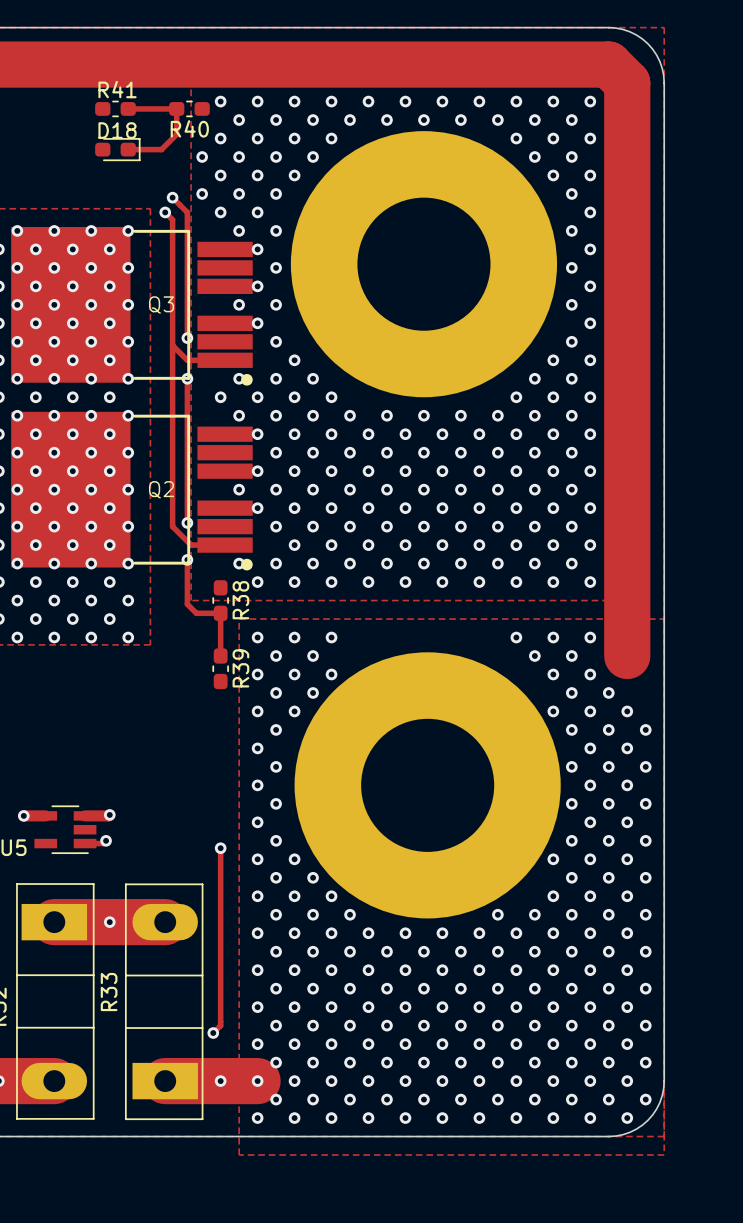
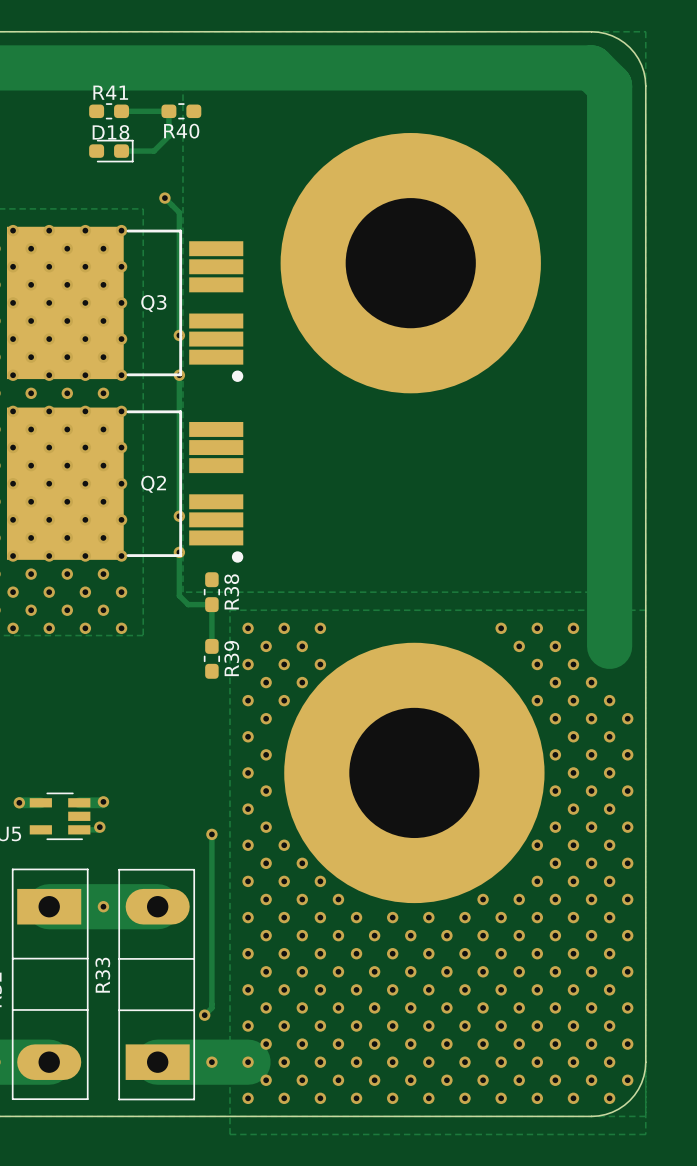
via: (220, 101) -> none
via: (257, 101) -> none
via: (294, 101) -> none
via: (331, 101) -> none
via: (368, 101) -> none
via: (405, 101) -> none
via: (442, 101) -> none
via: (479, 101) -> none
via: (516, 101) -> none
via: (553, 101) -> none
via: (590, 101) -> none
via: (239, 120) -> none
via: (276, 120) -> none
via: (313, 120) -> none
via: (350, 120) -> none
via: (386, 120) -> none
via: (423, 120) -> none
via: (460, 120) -> none
via: (497, 120) -> none
via: (534, 120) -> none
via: (571, 120) -> none
via: (220, 138) -> none
via: (257, 138) -> none
via: (294, 138) -> none
via: (331, 138) -> none
via: (516, 138) -> none
via: (553, 138) -> none
via: (590, 138) -> none
via: (202, 156) -> none
via: (239, 156) -> none
via: (276, 156) -> none
via: (313, 156) -> none
via: (534, 156) -> none
via: (571, 156) -> none
via: (220, 175) -> none
via: (257, 175) -> none
via: (294, 175) -> none
via: (553, 175) -> none
via: (590, 175) -> none
via: (202, 193) -> none
via: (239, 193) -> none
via: (276, 193) -> none
via: (571, 193) -> none
track: (165, 212) (172, 219) (172, 526) (191, 545) (225, 545) -> none
via: (165, 212) -> none
via: (220, 212) -> none
via: (257, 212) -> none
via: (590, 212) -> none
via: (239, 230) -> none
via: (276, 230) -> none
via: (571, 230) -> none
via: (257, 249) -> none
via: (590, 249) -> none
via: (276, 267) -> none
via: (571, 267) -> none
via: (257, 286) -> none
via: (590, 286) -> none
via: (239, 304) -> none
via: (276, 304) -> none
via: (571, 304) -> none
via: (257, 323) -> none
via: (590, 323) -> none
via: (276, 341) -> none
via: (571, 341) -> none
track: (172, 345) (187, 360) (225, 360) -> none
via: (294, 360) -> none
via: (553, 360) -> none
via: (590, 360) -> none
via: (239, 378) -> none
via: (276, 378) -> none
via: (313, 378) -> none
via: (534, 378) -> none
via: (571, 378) -> none
via: (220, 397) -> none
via: (257, 397) -> none
via: (294, 397) -> none
via: (331, 397) -> none
via: (516, 397) -> none
via: (553, 397) -> none
via: (590, 397) -> none
via: (239, 415) -> none
via: (276, 415) -> none
via: (313, 415) -> none
via: (350, 415) -> none
via: (386, 415) -> none
via: (423, 415) -> none
via: (460, 415) -> none
via: (497, 415) -> none
via: (534, 415) -> none
via: (571, 415) -> none
via: (257, 434) -> none
via: (294, 434) -> none
via: (331, 434) -> none
via: (368, 434) -> none
via: (405, 434) -> none
via: (442, 434) -> none
via: (479, 434) -> none
via: (516, 434) -> none
via: (553, 434) -> none
via: (590, 434) -> none
via: (276, 452) -> none
via: (313, 452) -> none
via: (350, 452) -> none
via: (386, 452) -> none
via: (423, 452) -> none
via: (460, 452) -> none
via: (497, 452) -> none
via: (534, 452) -> none
via: (571, 452) -> none
via: (257, 471) -> none
via: (294, 471) -> none
via: (331, 471) -> none
via: (368, 471) -> none
via: (405, 471) -> none
via: (442, 471) -> none
via: (479, 471) -> none
via: (516, 471) -> none
via: (553, 471) -> none
via: (590, 471) -> none
via: (239, 489) -> none
via: (276, 489) -> none
via: (313, 489) -> none
via: (350, 489) -> none
via: (386, 489) -> none
via: (423, 489) -> none
via: (460, 489) -> none
via: (497, 489) -> none
via: (534, 489) -> none
via: (571, 489) -> none
via: (257, 508) -> none
via: (294, 508) -> none
via: (331, 508) -> none
via: (368, 508) -> none
via: (405, 508) -> none
via: (442, 508) -> none
via: (479, 508) -> none
via: (516, 508) -> none
via: (553, 508) -> none
via: (590, 508) -> none
via: (276, 526) -> none
via: (313, 526) -> none
via: (350, 526) -> none
via: (386, 526) -> none
via: (423, 526) -> none
via: (460, 526) -> none
via: (497, 526) -> none
via: (534, 526) -> none
via: (571, 526) -> none
via: (294, 545) -> none
via: (331, 545) -> none
via: (368, 545) -> none
via: (405, 545) -> none
via: (442, 545) -> none
via: (479, 545) -> none
via: (516, 545) -> none
via: (553, 545) -> none
via: (590, 545) -> none
via: (239, 563) -> none
via: (276, 563) -> none
via: (313, 563) -> none
via: (350, 563) -> none
via: (386, 563) -> none
via: (423, 563) -> none
via: (460, 563) -> none
via: (497, 563) -> none
via: (534, 563) -> none
via: (571, 563) -> none
via: (257, 582) -> none
via: (294, 582) -> none
via: (331, 582) -> none
via: (368, 582) -> none
via: (405, 582) -> none
via: (442, 582) -> none
via: (479, 582) -> none
via: (516, 582) -> none
via: (553, 582) -> none
via: (590, 582) -> none

